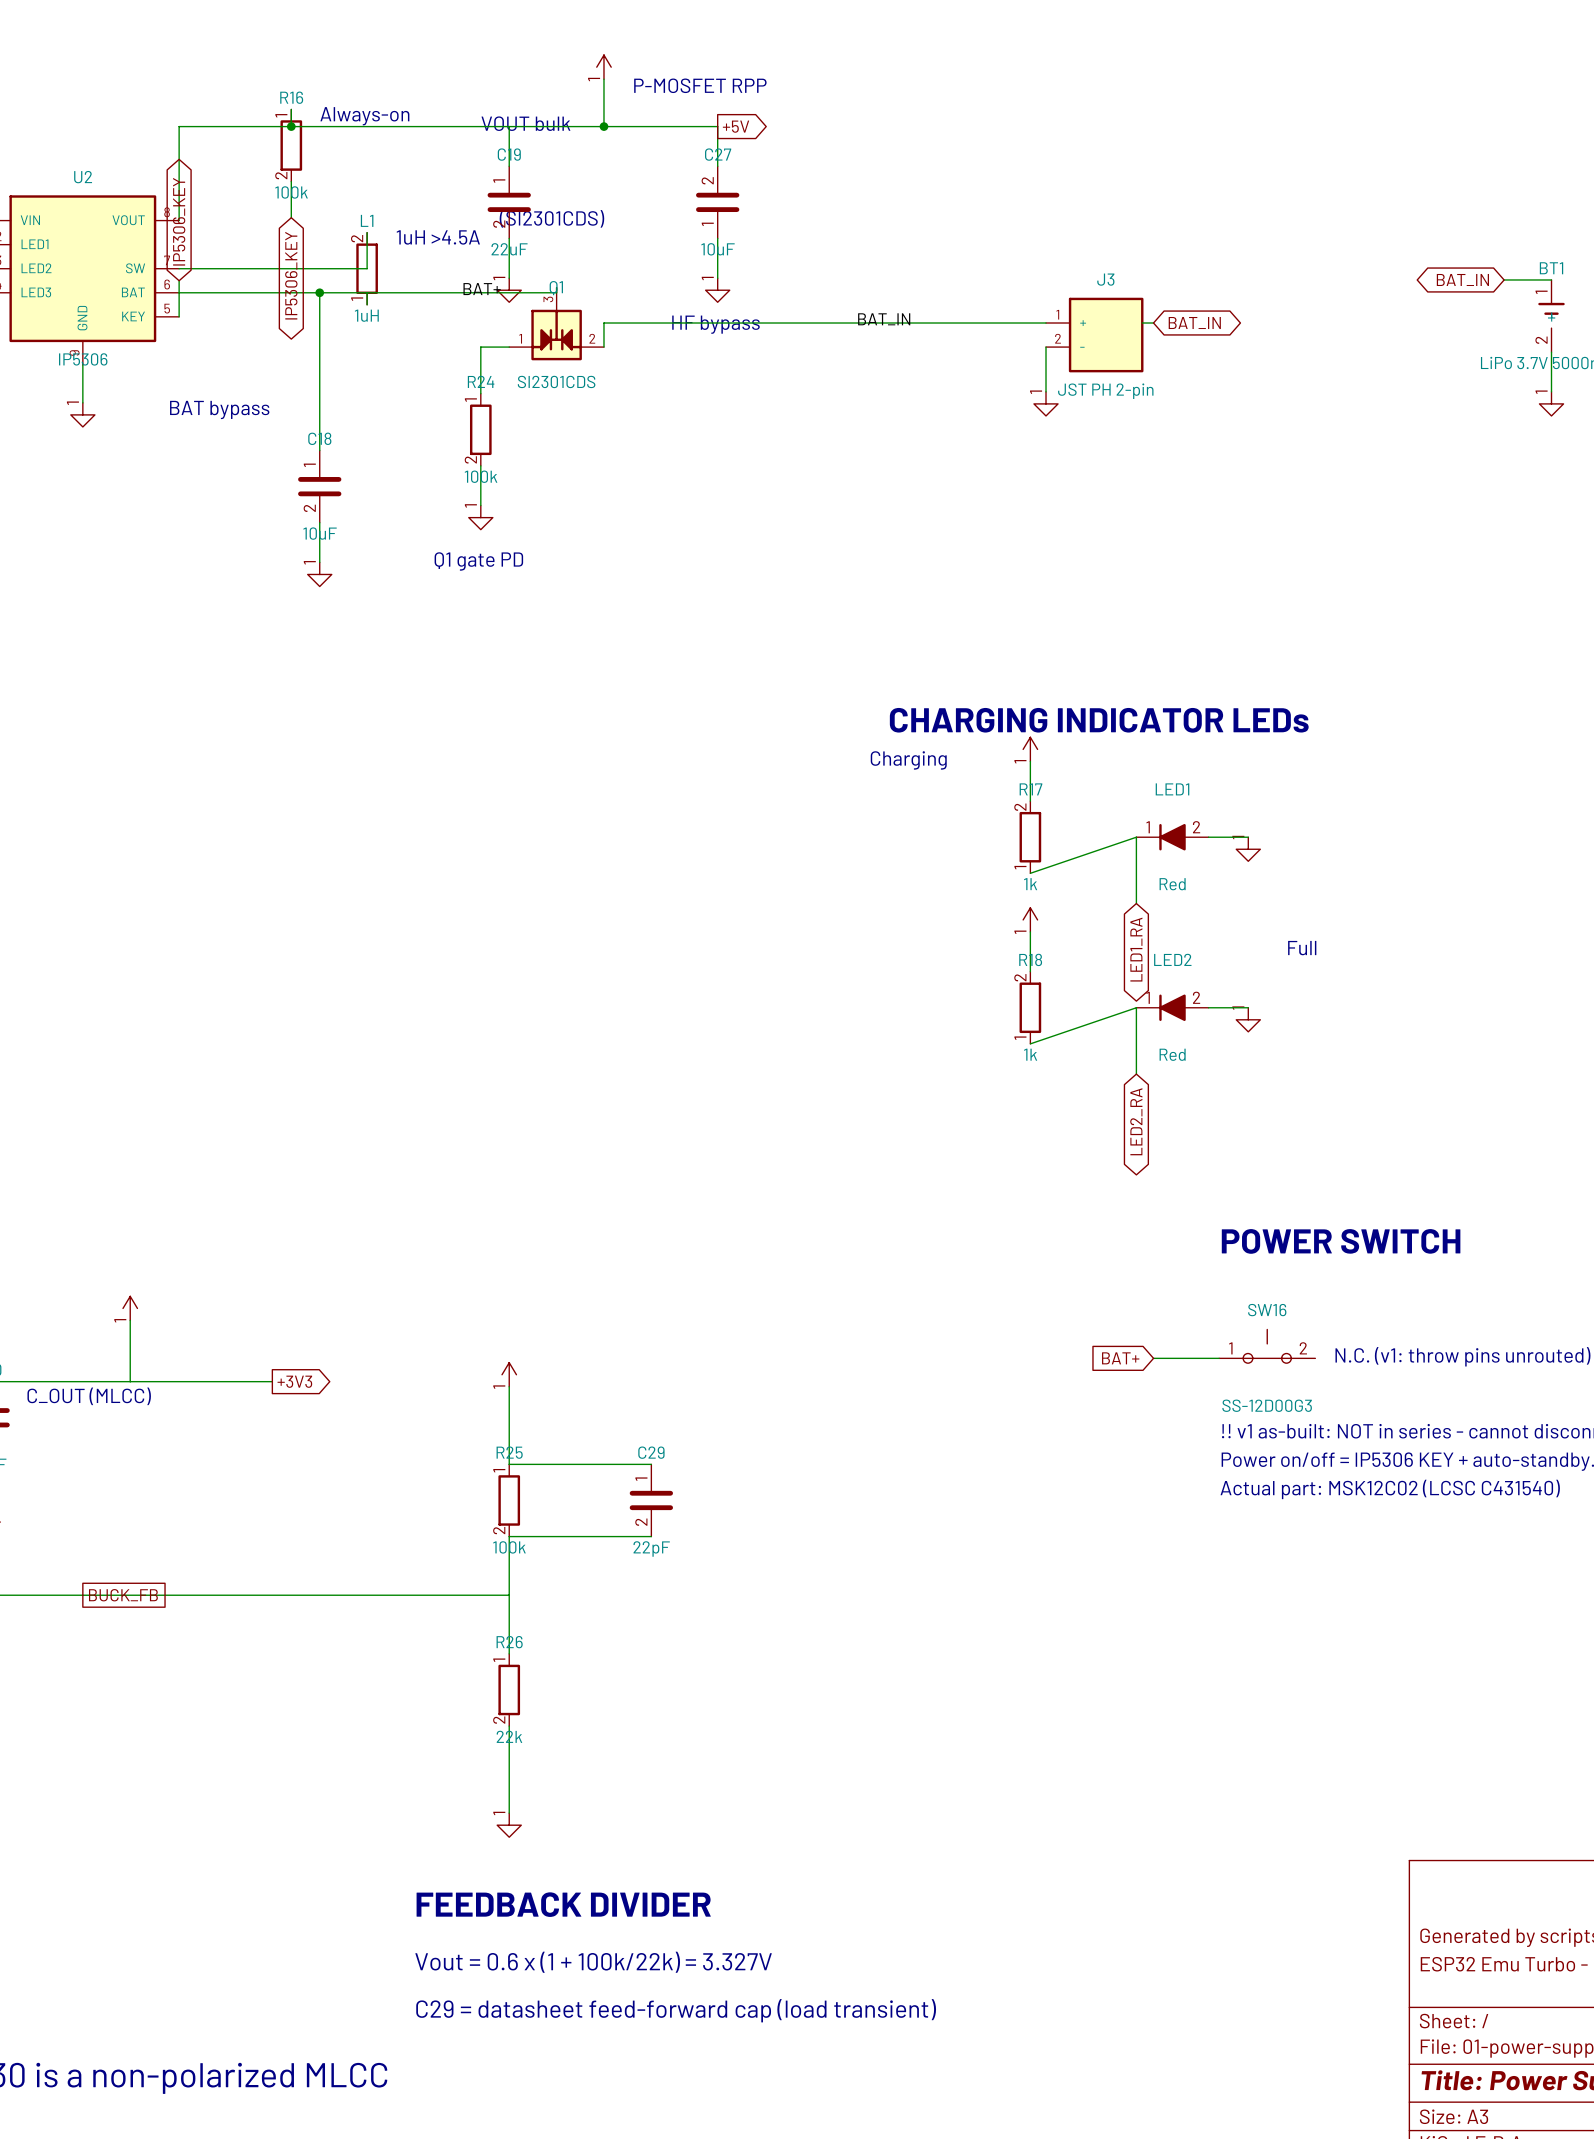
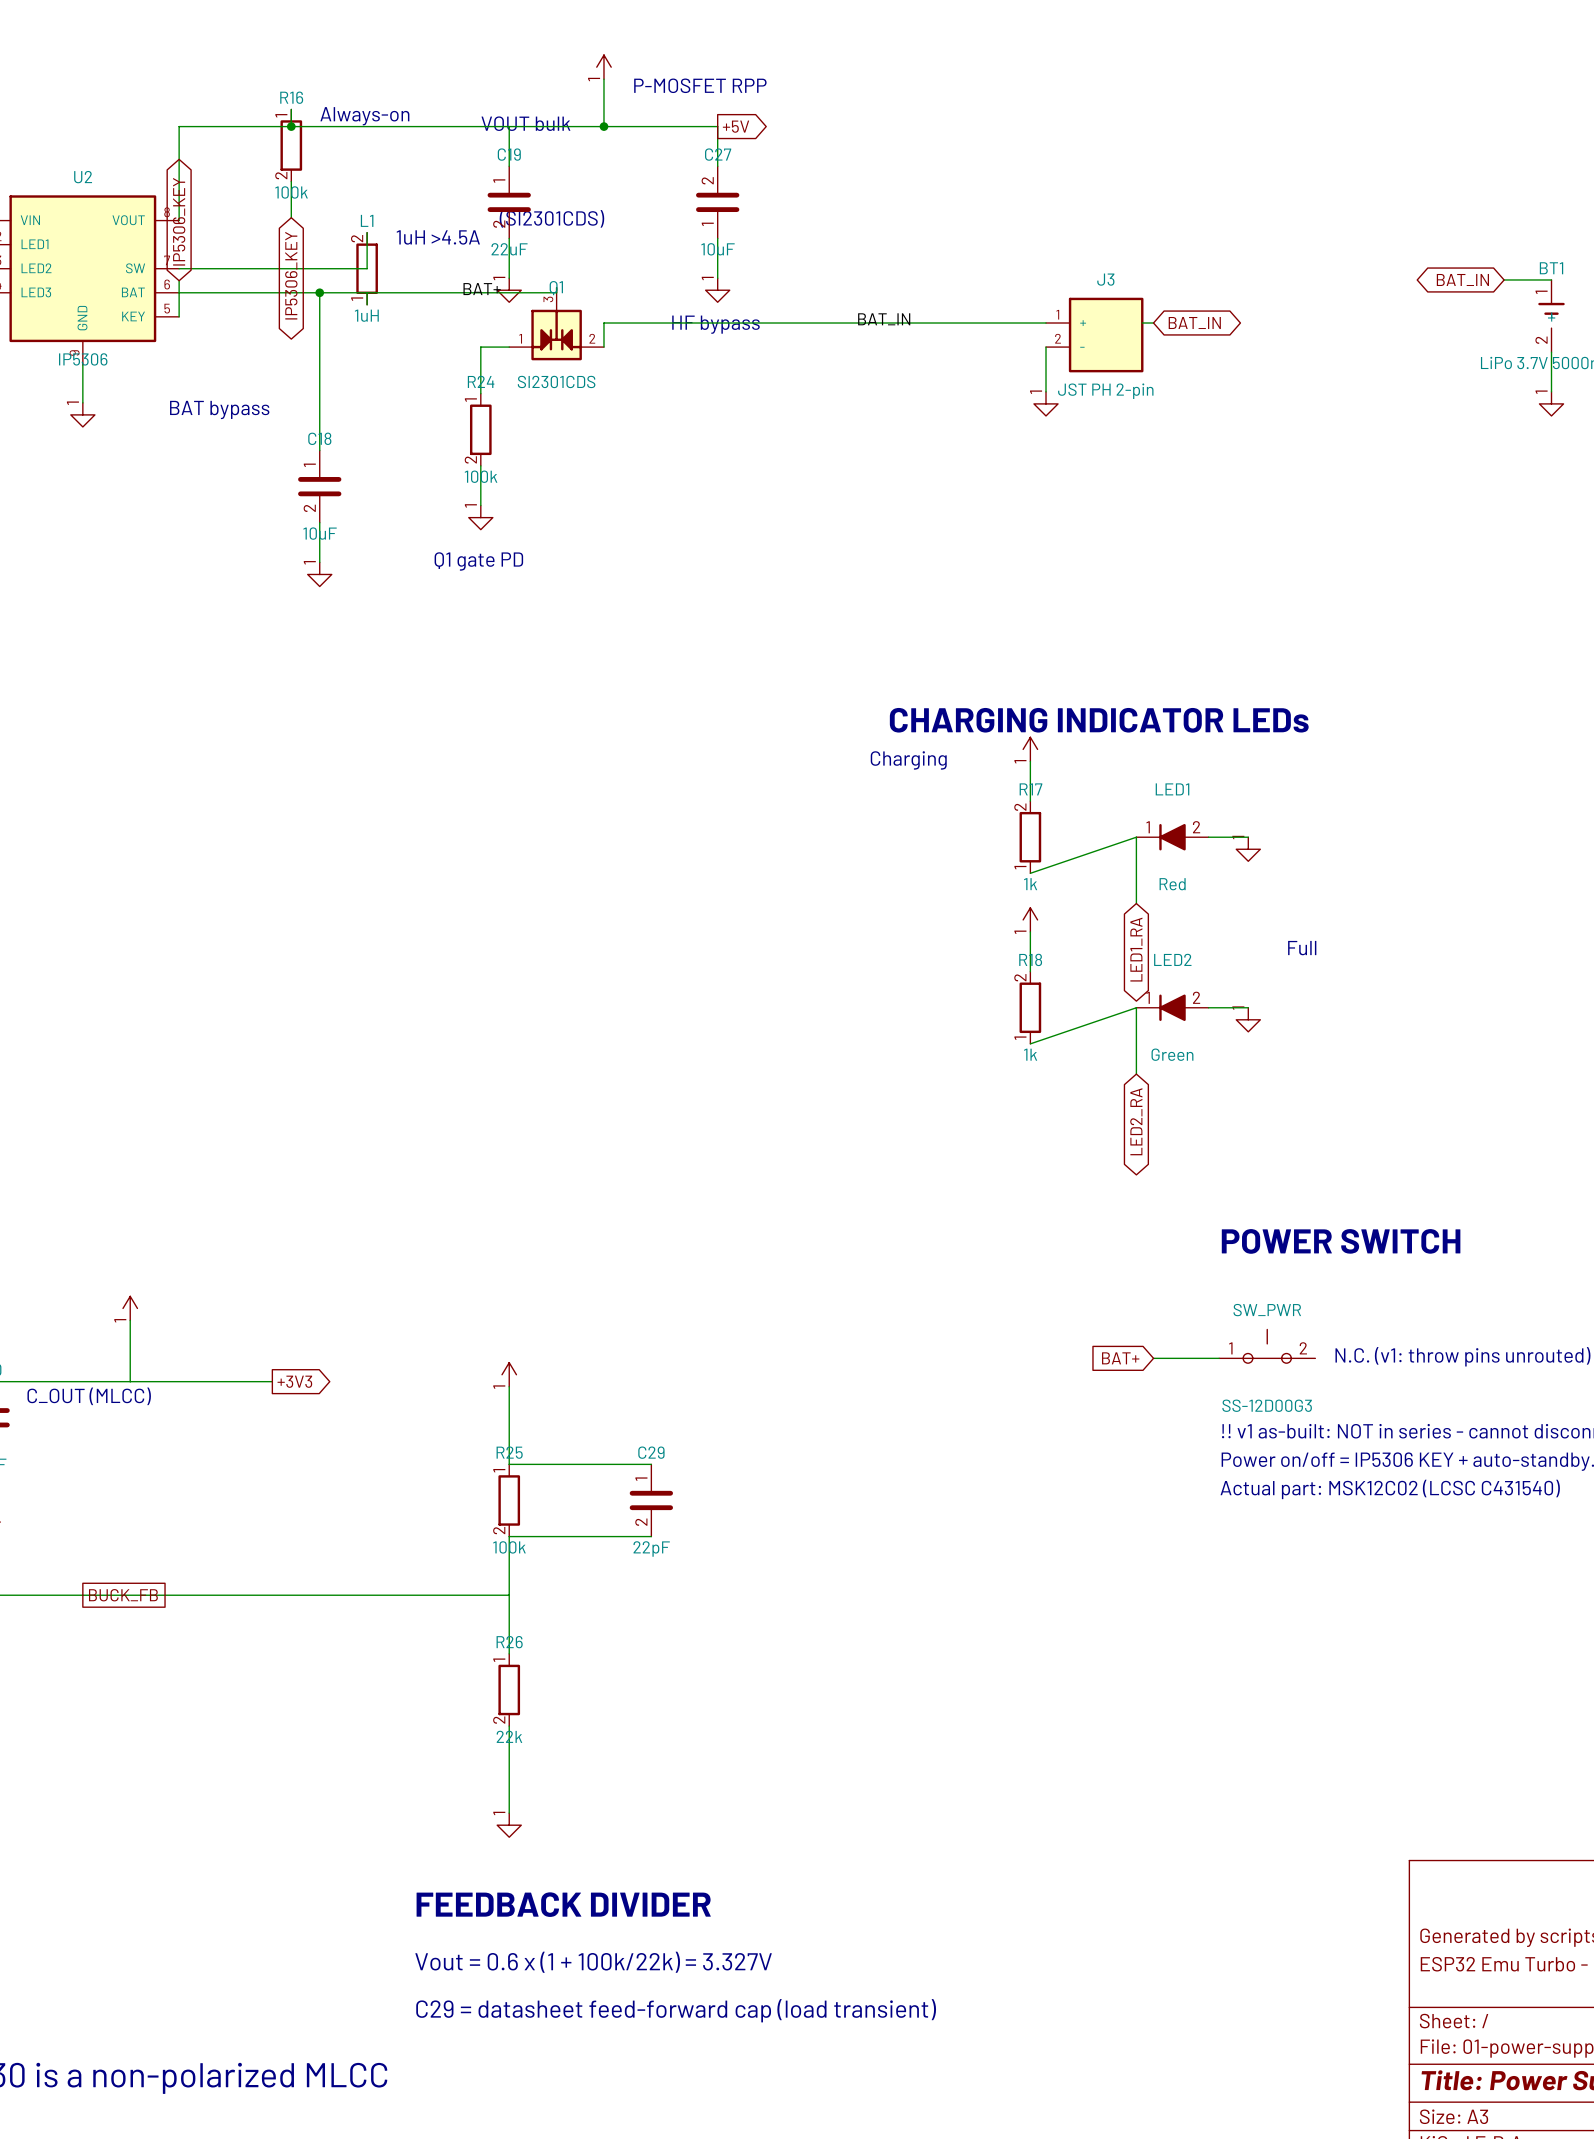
LED2 value: Red (1172, 1054) -> Green (1172, 1054)
SW16 name: SW16 (1267, 1310) -> SW_PWR (1267, 1310)

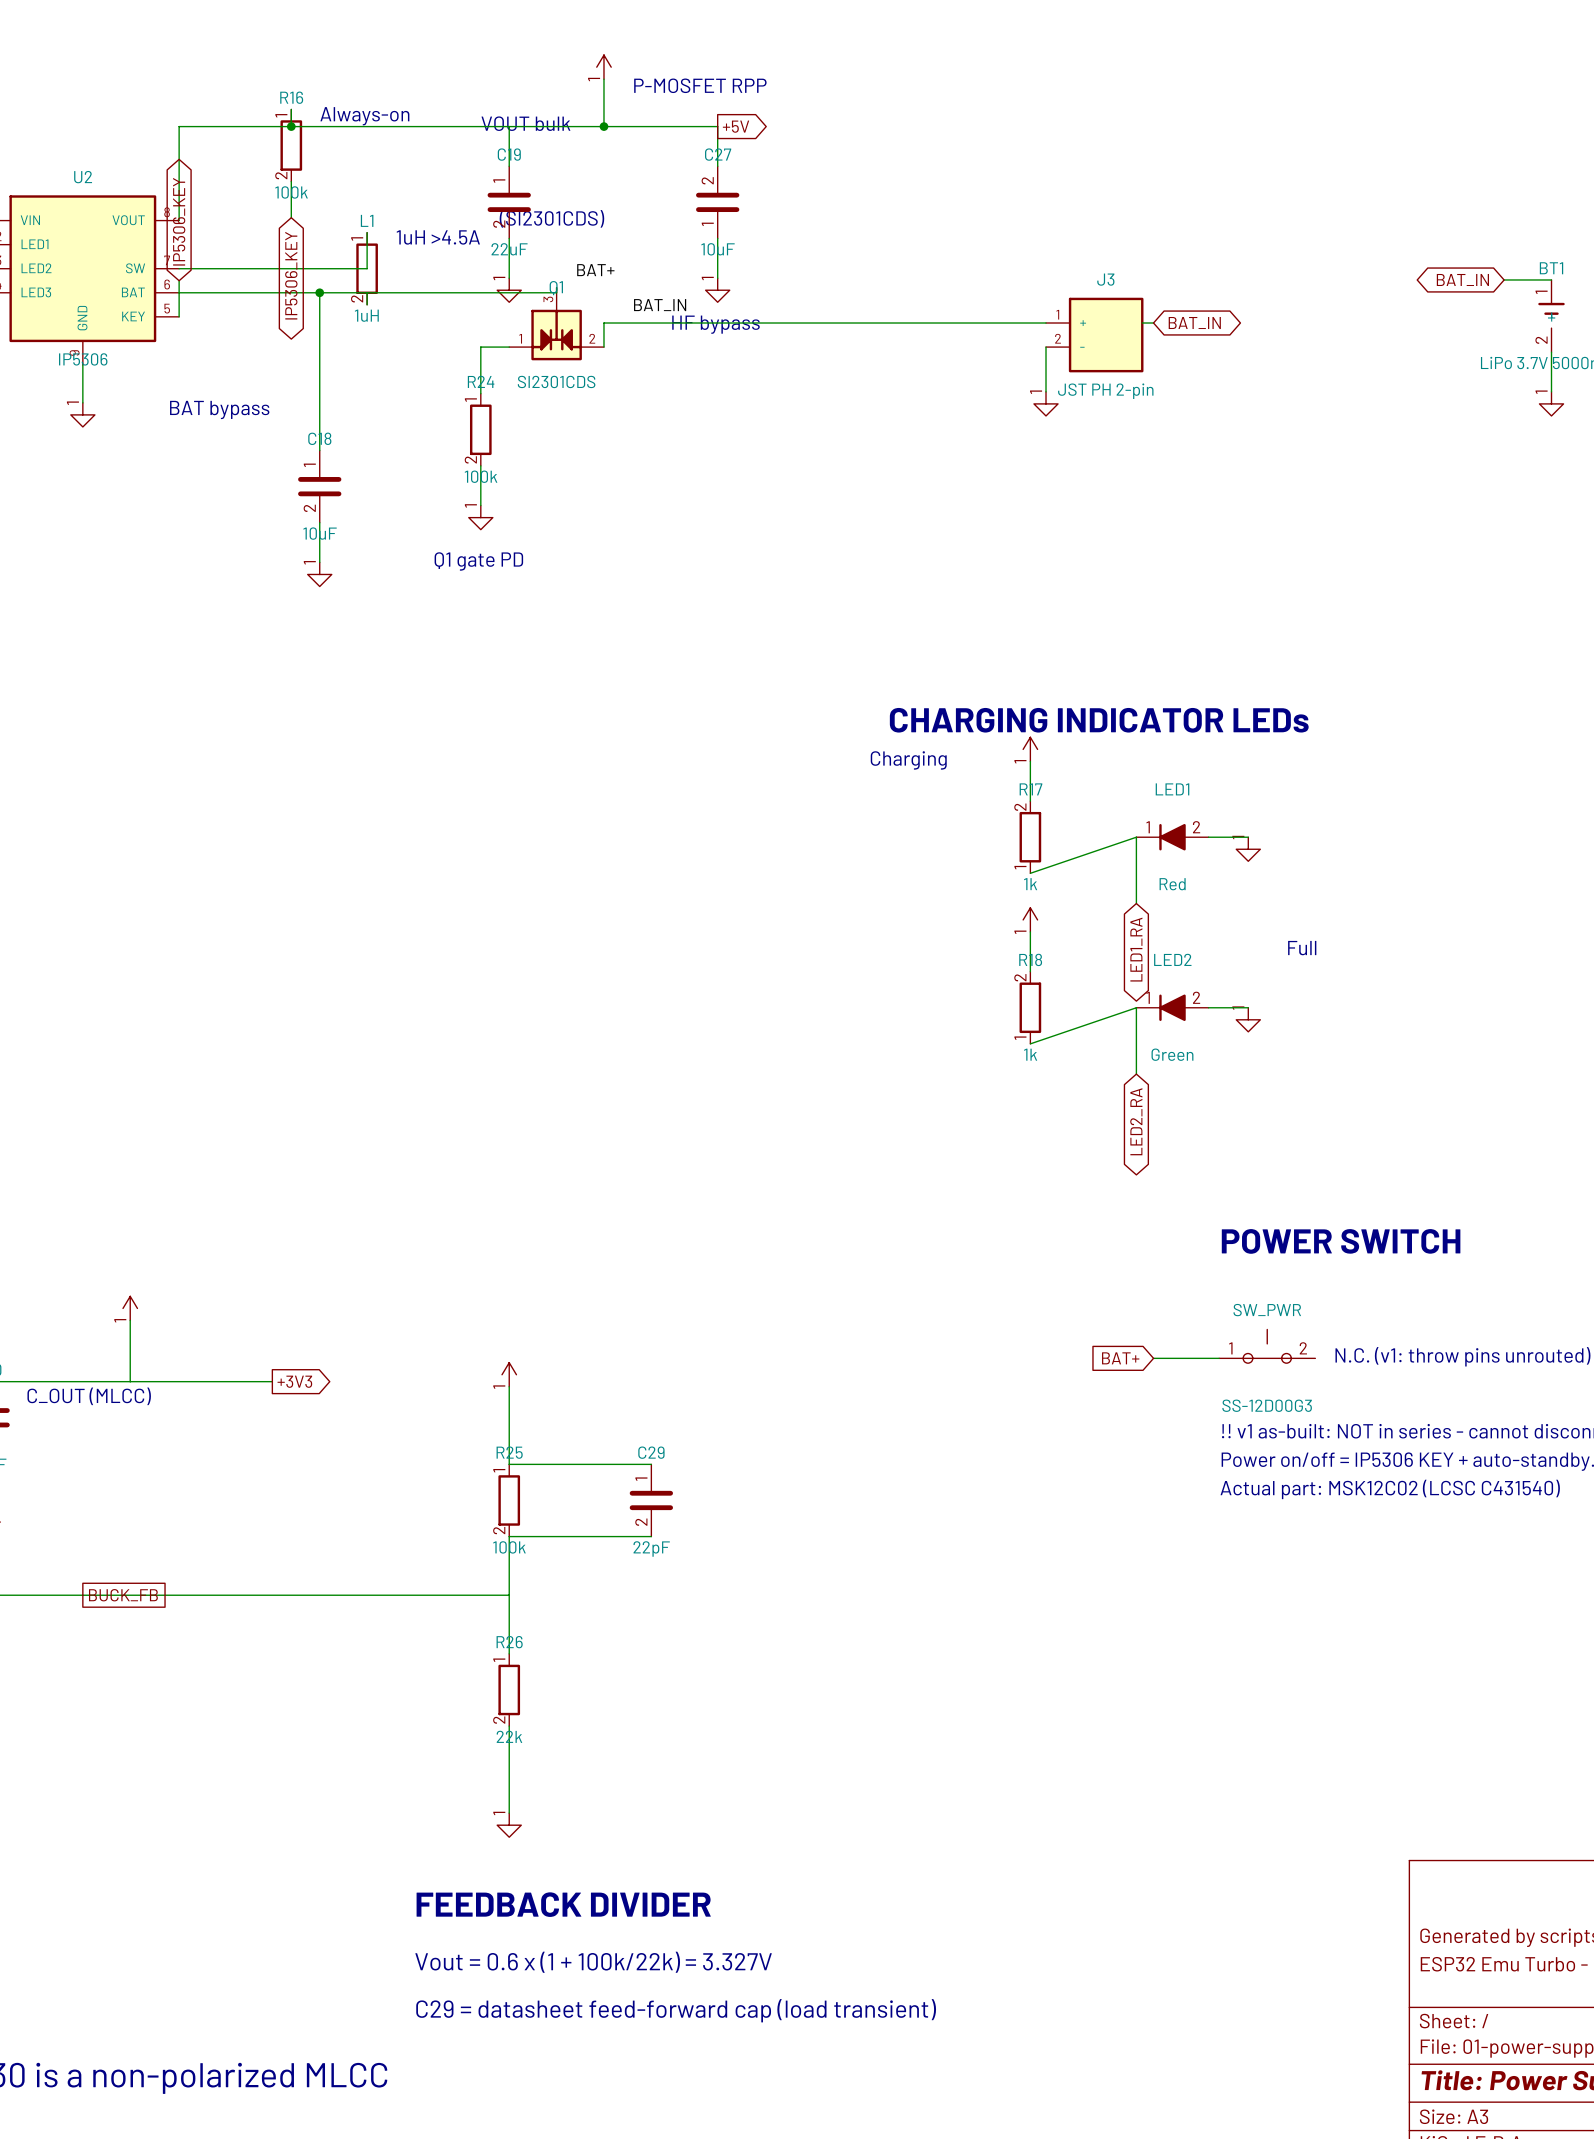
L1 rotation: 0° (367, 268) -> 180° (367, 268)
label position: BAT+ (482, 289) -> BAT+ (595, 270)
label position: BAT_IN (884, 319) -> BAT_IN (660, 305)

